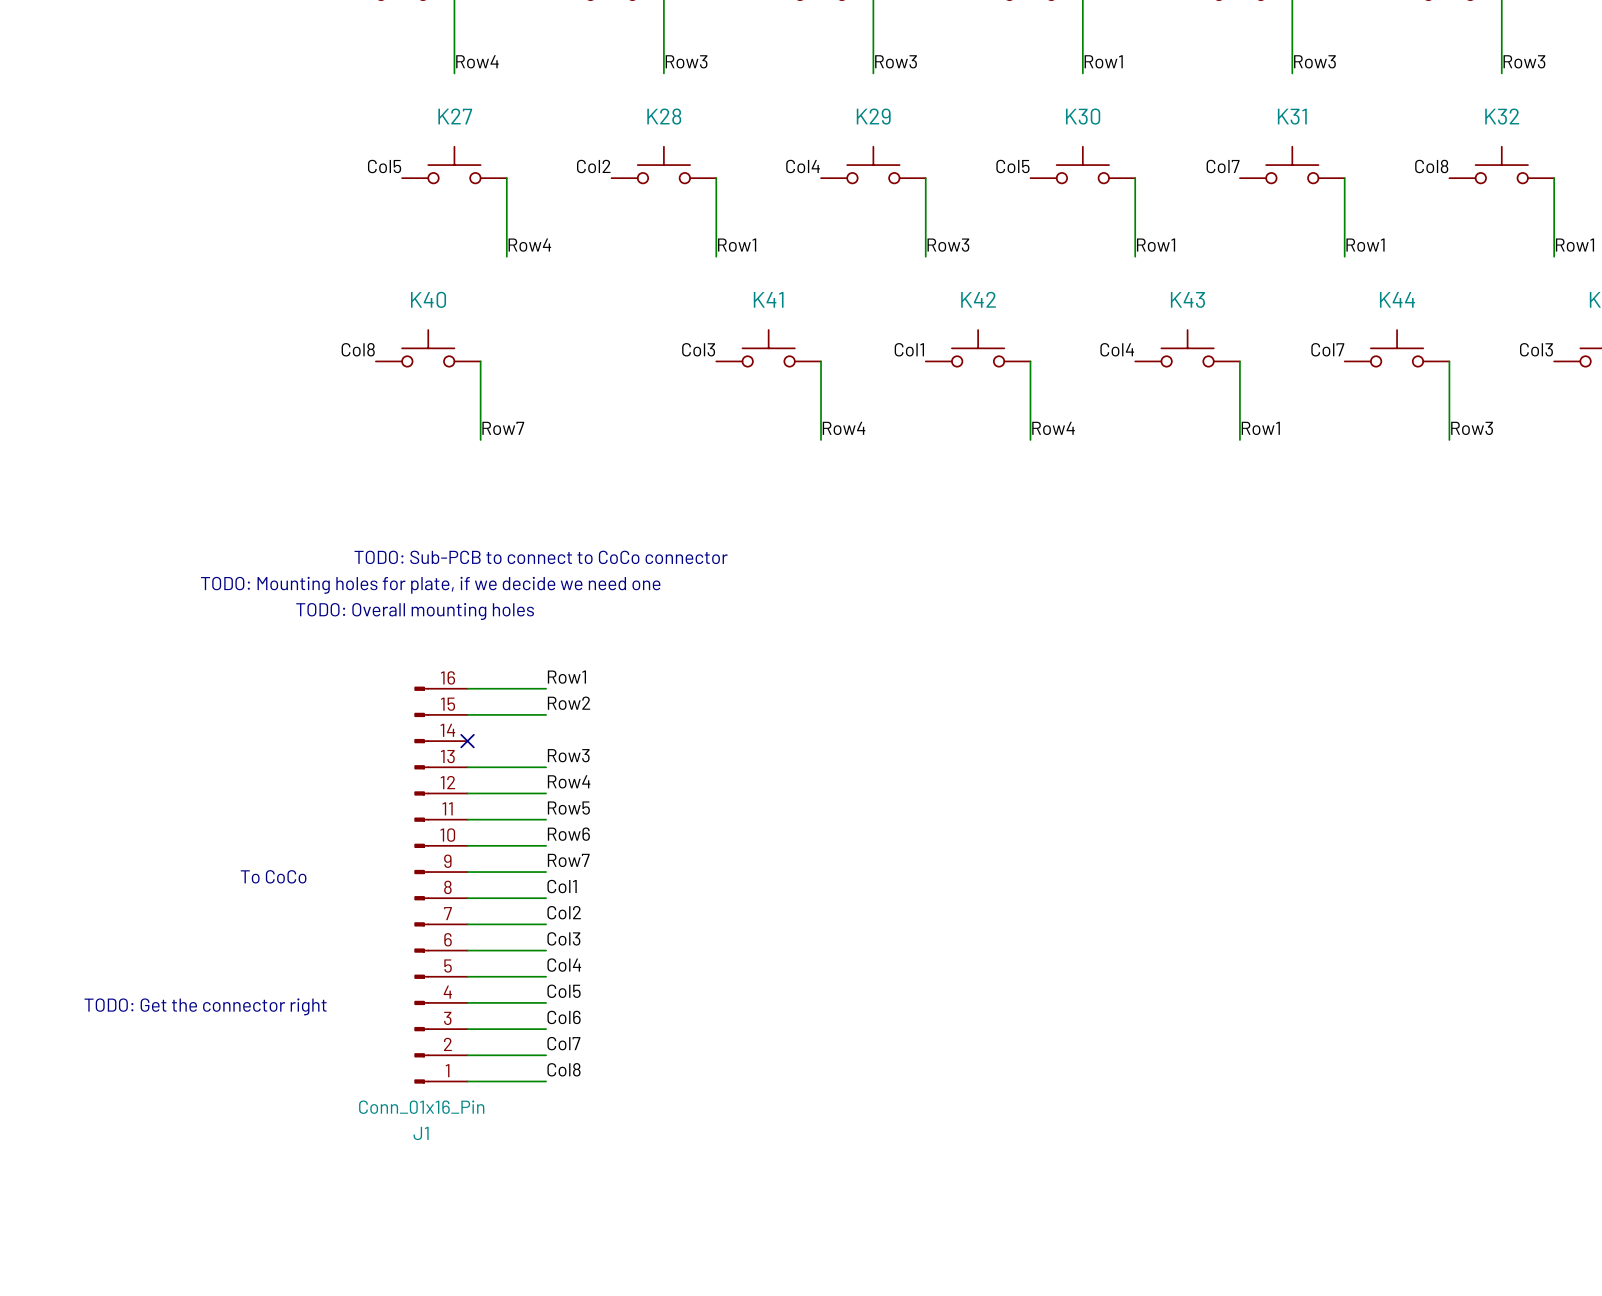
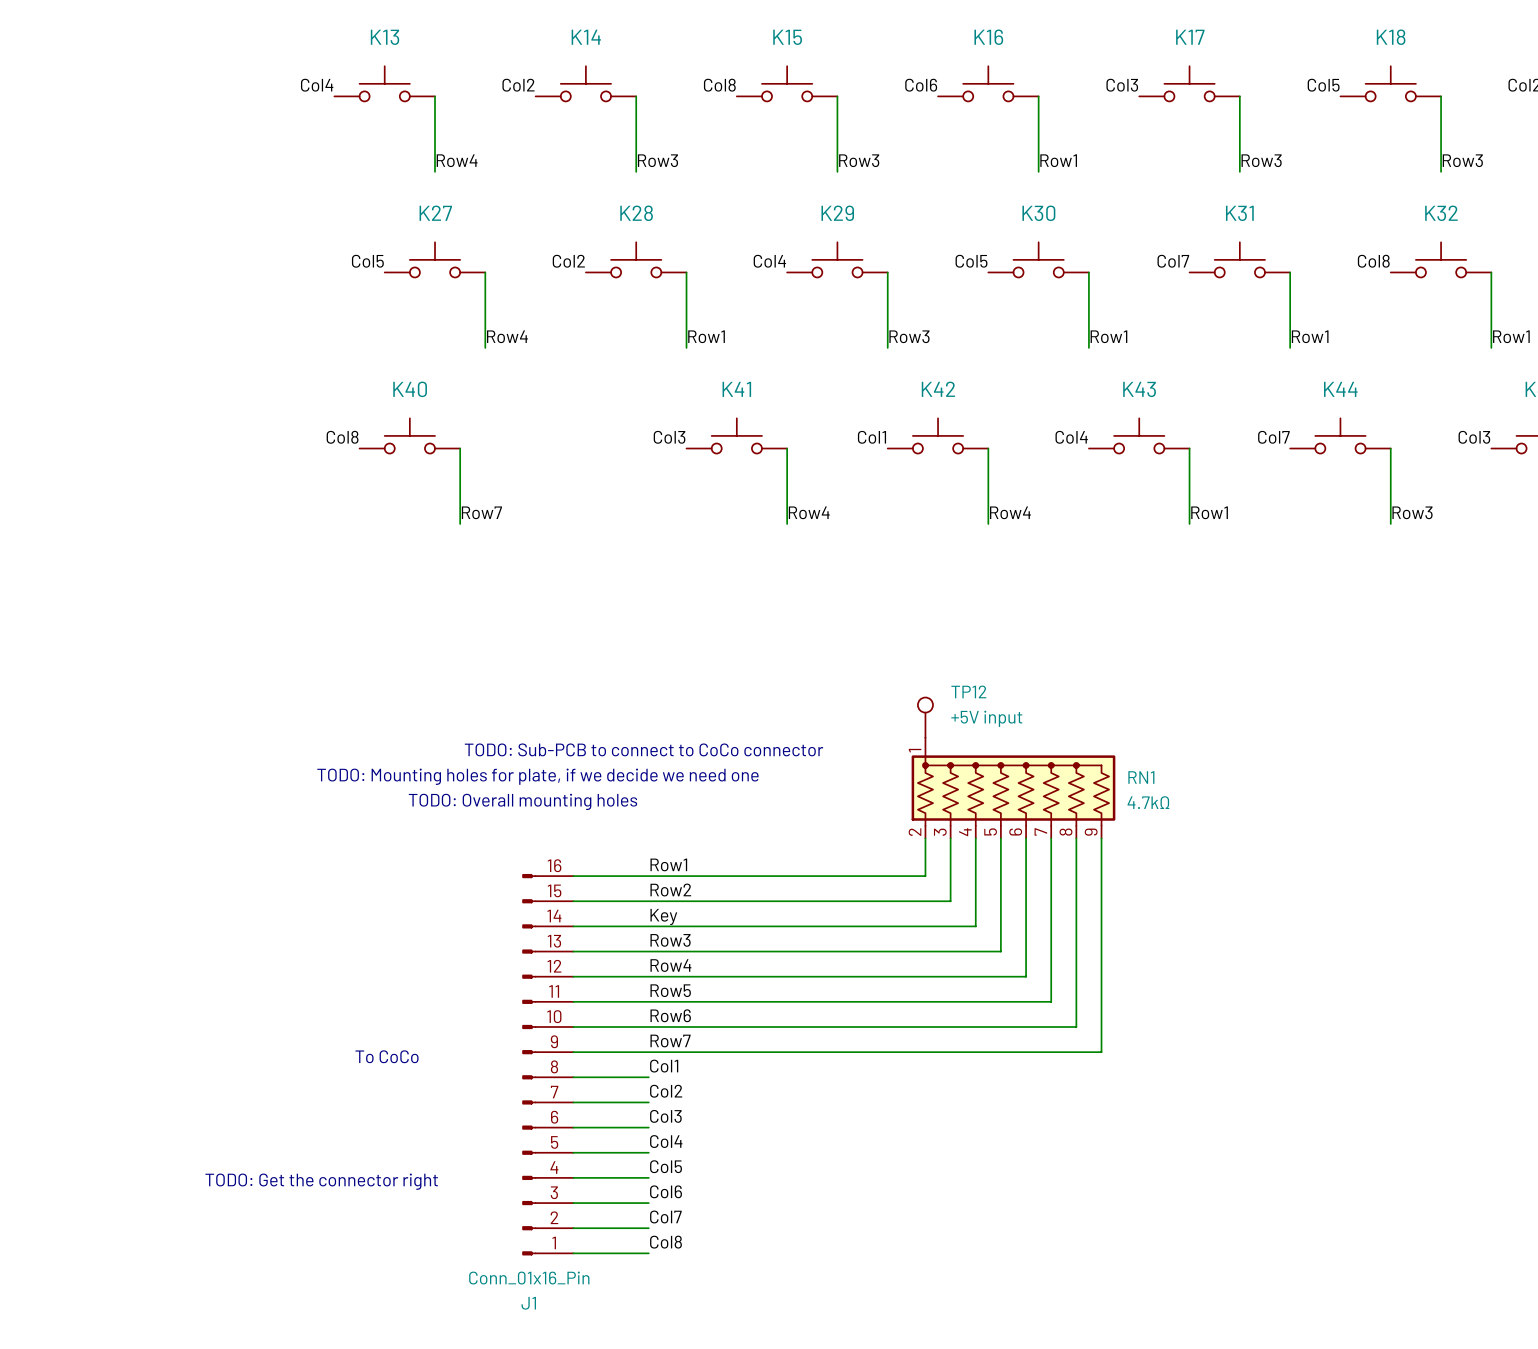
text position: TODO: Sub-PCB to connect to CoCo connector (541, 557) -> TODO: Sub-PCB to connect to CoCo connector (644, 749)
text position: TODO: Mounting holes for plate, if we decide we need one (430, 585) -> TODO: Mounting holes for plate, if we decide we need one (537, 776)
text position: TODO: Overall mounting holes (415, 611) -> TODO: Overall mounting holes (522, 801)
TP12: none -> +5V input (925, 717)
label position: Row1 (566, 677) -> Row1 (668, 864)
wire: (467, 688) (546, 688) -> none
label position: Row2 (568, 703) -> Row2 (670, 890)
wire: (467, 714) (546, 714) -> none
RN1: none -> 4.7kΩ (1013, 788)
no-connect mark: (467, 741) -> none
label position: Row3 (568, 755) -> Row3 (670, 940)
wire: (467, 767) (546, 767) -> none
wire: none -> (925, 838) (925, 876) (573, 876)
wire: none -> (950, 838) (950, 901) (573, 901)
wire: none -> (975, 838) (975, 926) (573, 926)
wire: none -> (1000, 838) (1000, 951) (573, 951)
wire: none -> (1026, 838) (1026, 976) (573, 976)
wire: none -> (1051, 838) (1051, 1001) (573, 1001)
wire: none -> (1076, 838) (1076, 1026) (573, 1026)
wire: none -> (1101, 838) (1101, 1052) (573, 1052)
label position: Row4 (569, 781) -> Row4 (670, 965)
wire: (467, 793) (546, 793) -> none
label position: Row5 (568, 808) -> Row5 (670, 990)
wire: (467, 819) (546, 819) -> none
label position: Row6 (568, 834) -> Row6 (670, 1015)
wire: (467, 845) (546, 845) -> none
label: none -> Key (663, 916)
label position: Row7 (568, 860) -> Row7 (670, 1040)
wire: (467, 872) (546, 872) -> none
text position: To CoCo (273, 876) -> To CoCo (387, 1056)
J1 position: (440, 885) -> (547, 1064)
label position: Col1 (562, 886) -> Col1 (664, 1066)
wire: (467, 898) (546, 898) -> (573, 1077) (648, 1077)
label position: Col2 (564, 912) -> Col2 (666, 1091)
wire: (467, 924) (546, 924) -> (573, 1102) (648, 1102)
label position: Col3 (563, 938) -> Col3 (665, 1116)
wire: (467, 950) (546, 950) -> (573, 1127) (648, 1127)
label position: Col4 (564, 965) -> Col4 (666, 1141)
wire: (467, 976) (546, 976) -> (573, 1152) (648, 1152)
label position: Col5 (564, 991) -> Col5 (666, 1166)
wire: (467, 1002) (546, 1002) -> (573, 1177) (648, 1177)
text position: TODO: Get the connector right (205, 1006) -> TODO: Get the connector right (321, 1181)
label position: Col6 (564, 1017) -> Col6 (666, 1191)
wire: (467, 1029) (546, 1029) -> (573, 1203) (648, 1203)
label position: Col7 (563, 1043) -> Col7 (665, 1216)
wire: (467, 1055) (546, 1055) -> (573, 1228) (648, 1228)
label position: Col8 (563, 1069) -> Col8 (665, 1242)
wire: (467, 1081) (546, 1081) -> (573, 1253) (648, 1253)

